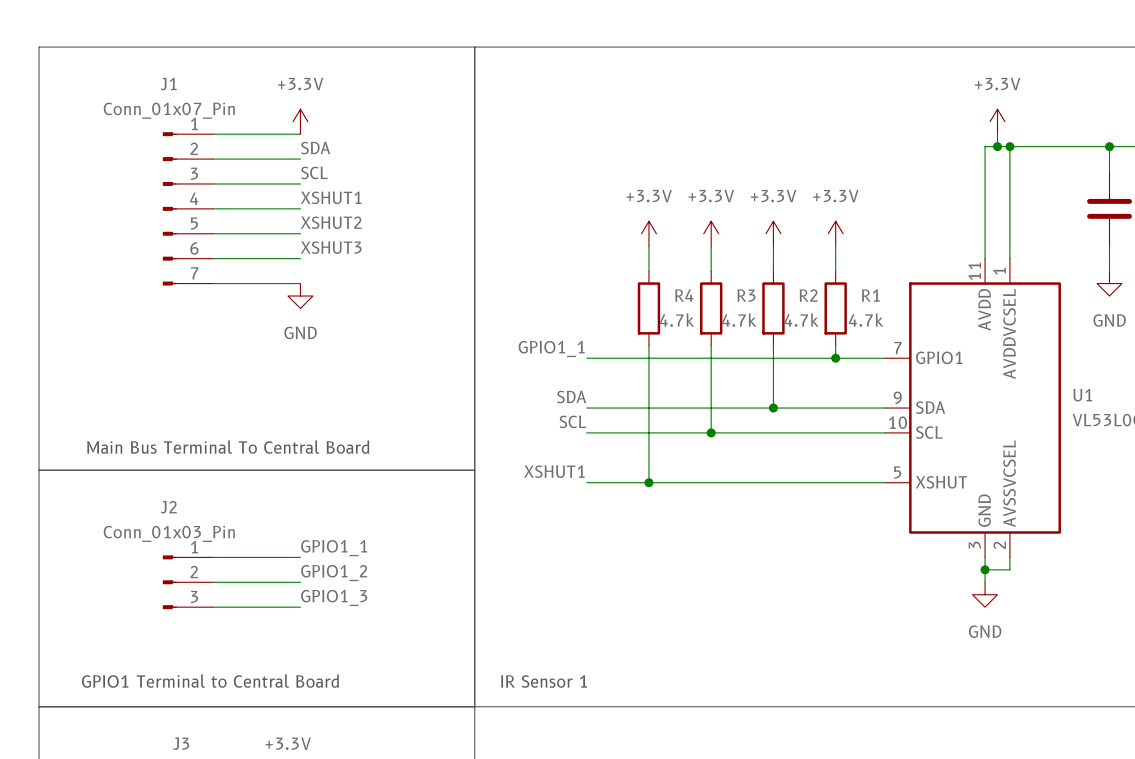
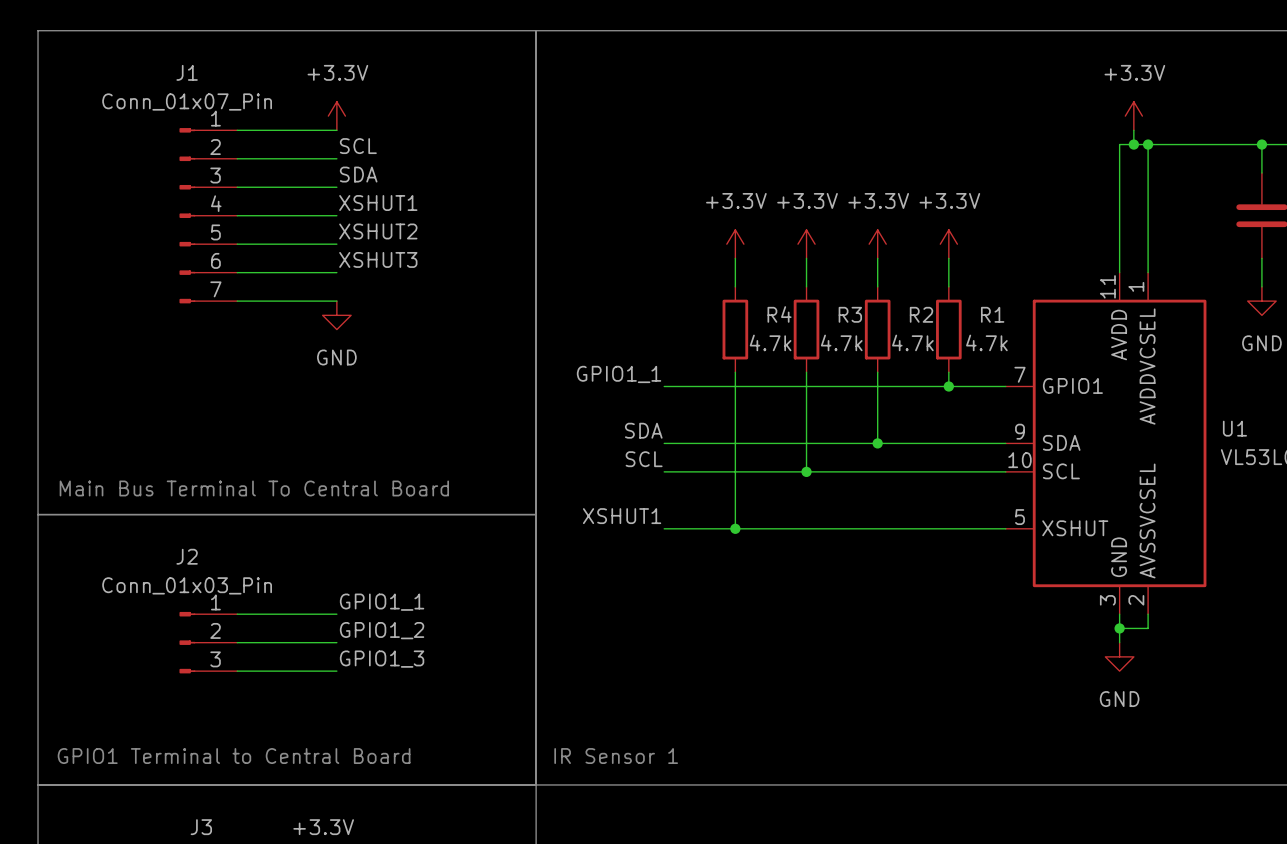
label: SDA (315, 148) -> SCL (358, 146)
label: SCL (314, 172) -> SDA (358, 174)

